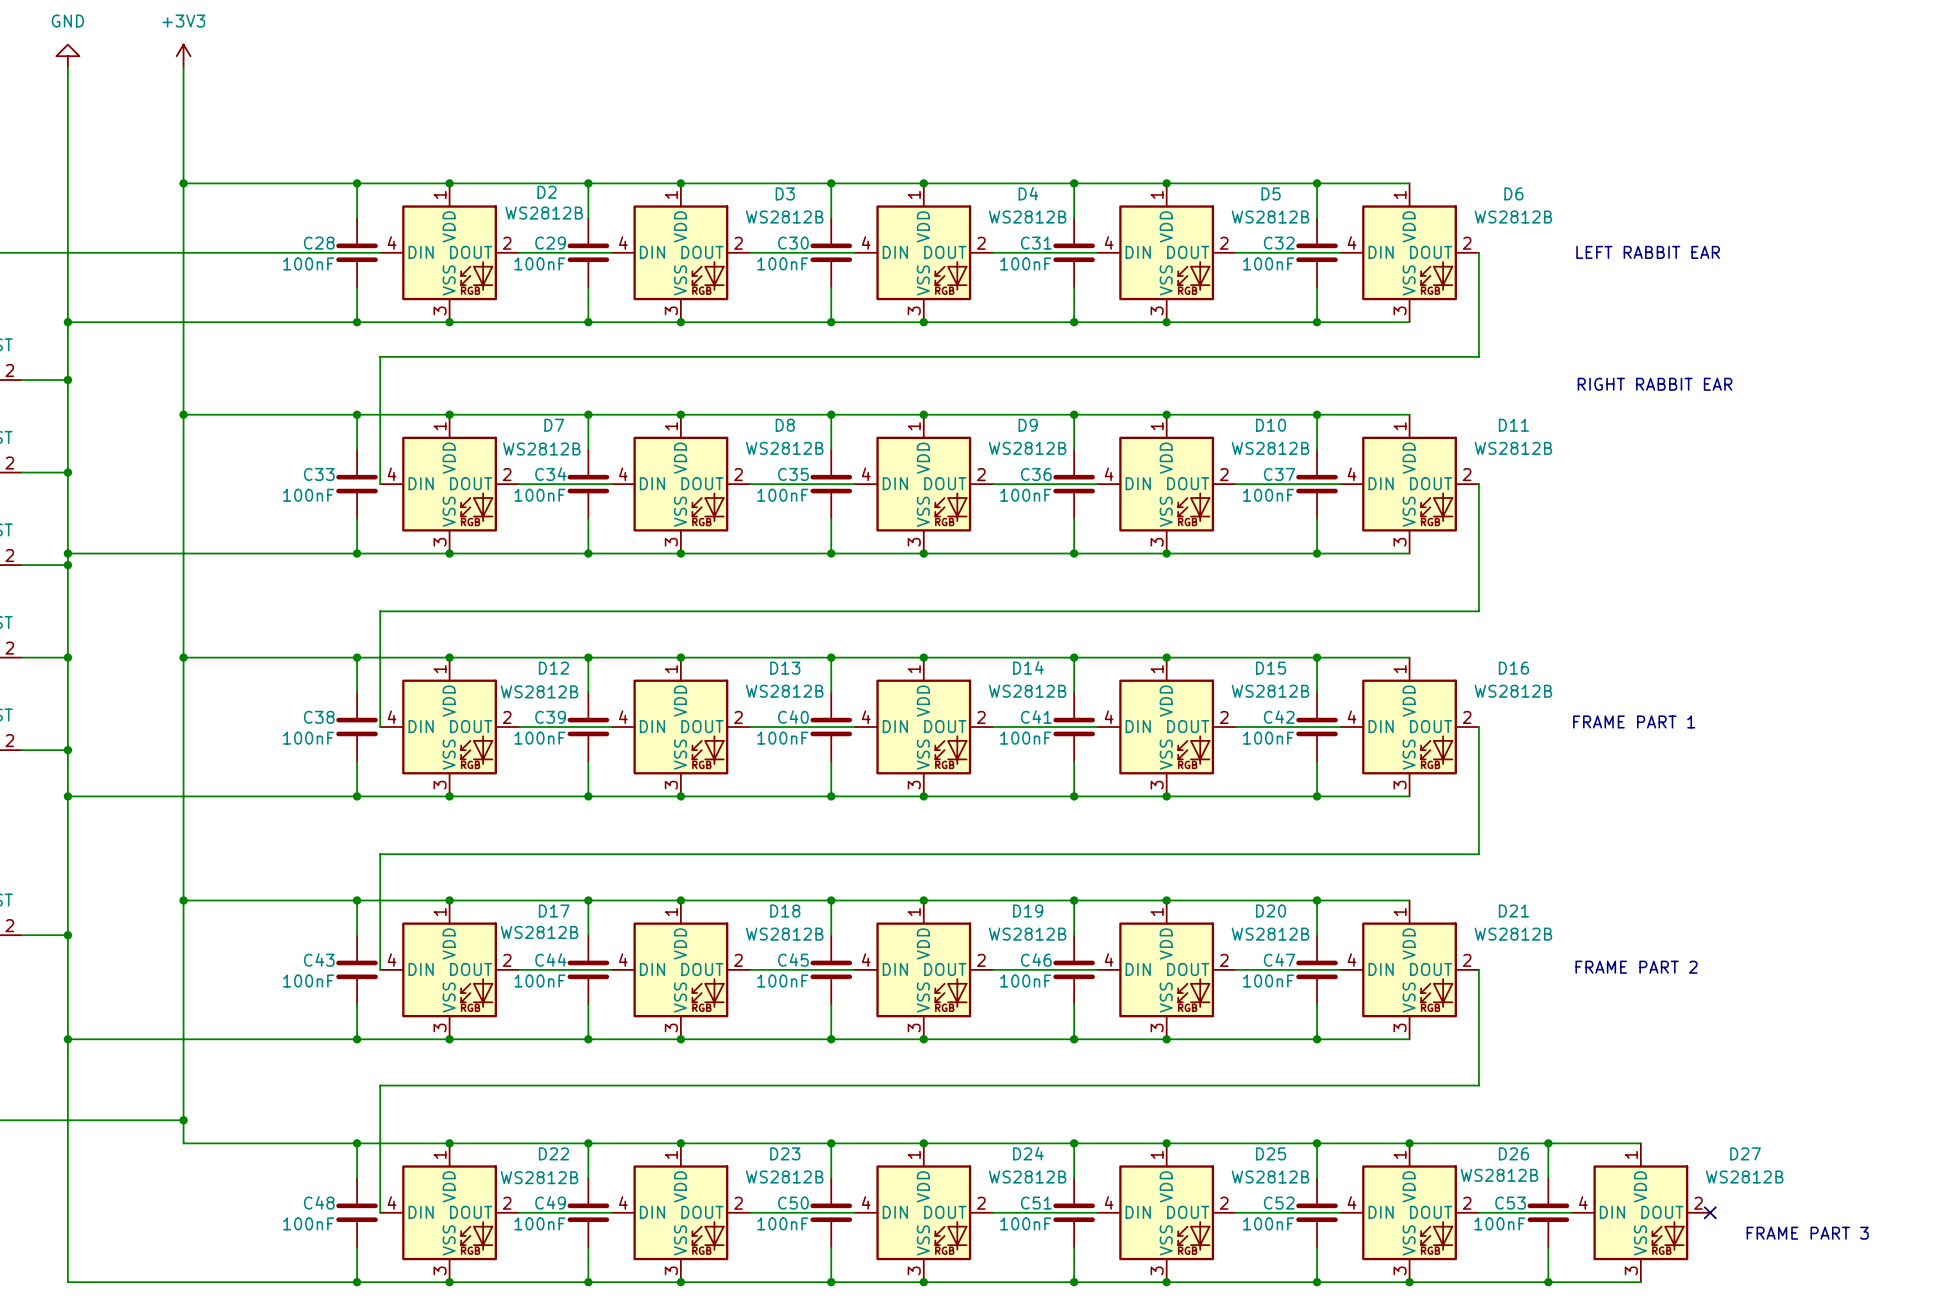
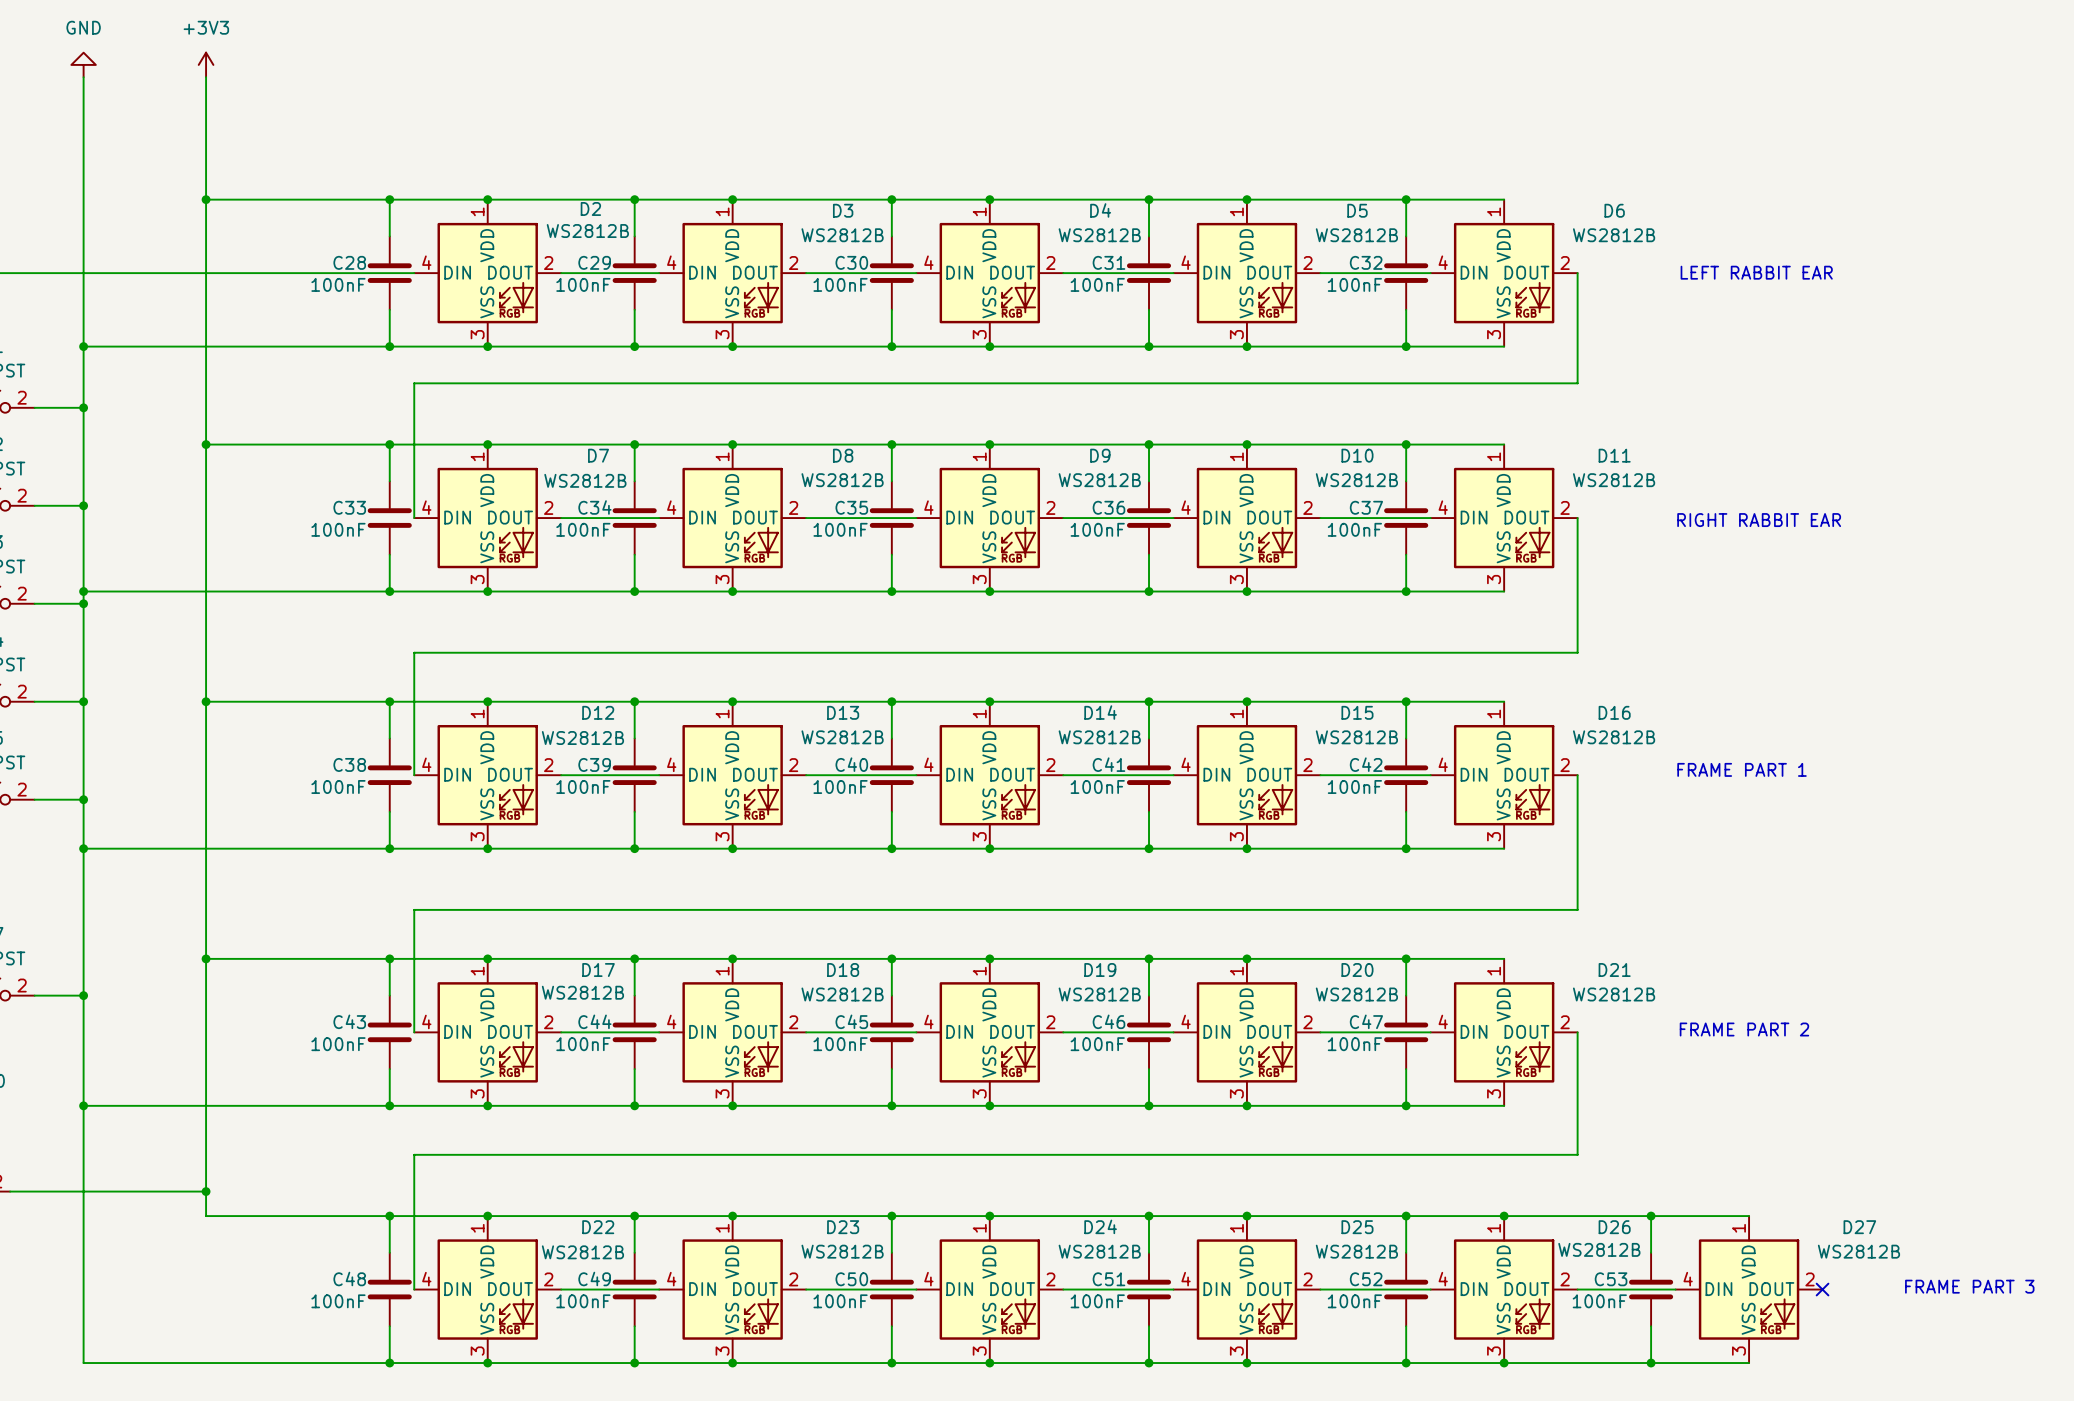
text position: RIGHT RABBIT EAR (1655, 384) -> RIGHT RABBIT EAR (1759, 520)
text position: FRAME PART 3 (1807, 1233) -> FRAME PART 3 (1969, 1286)

